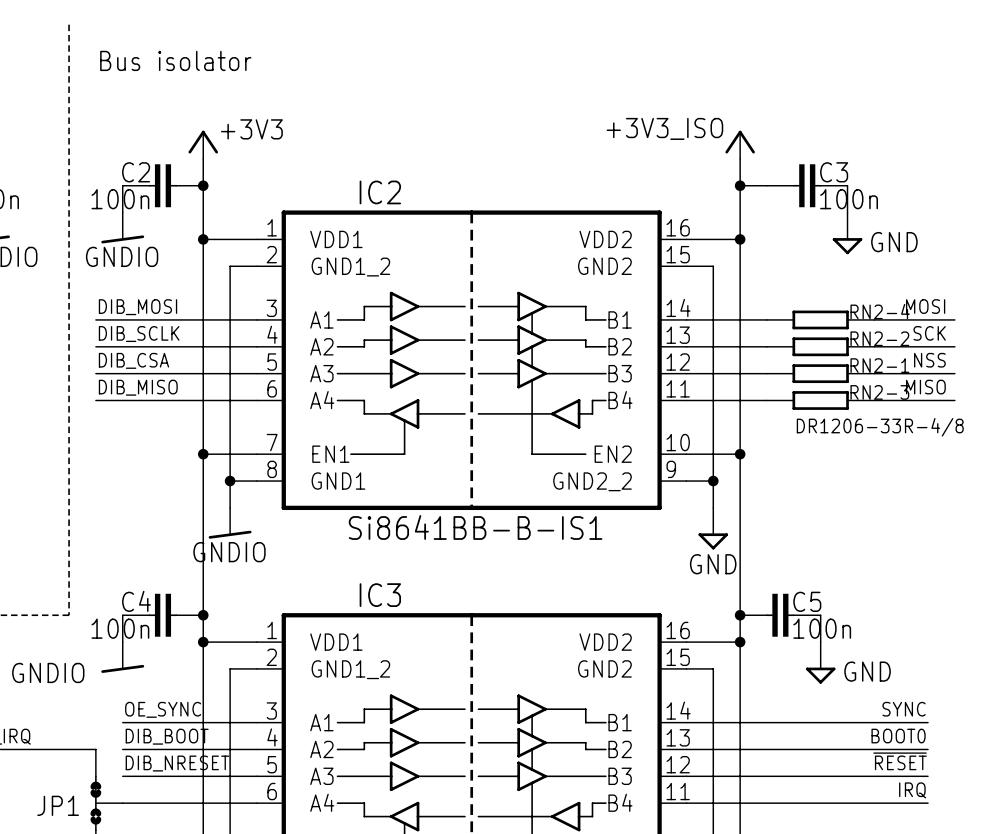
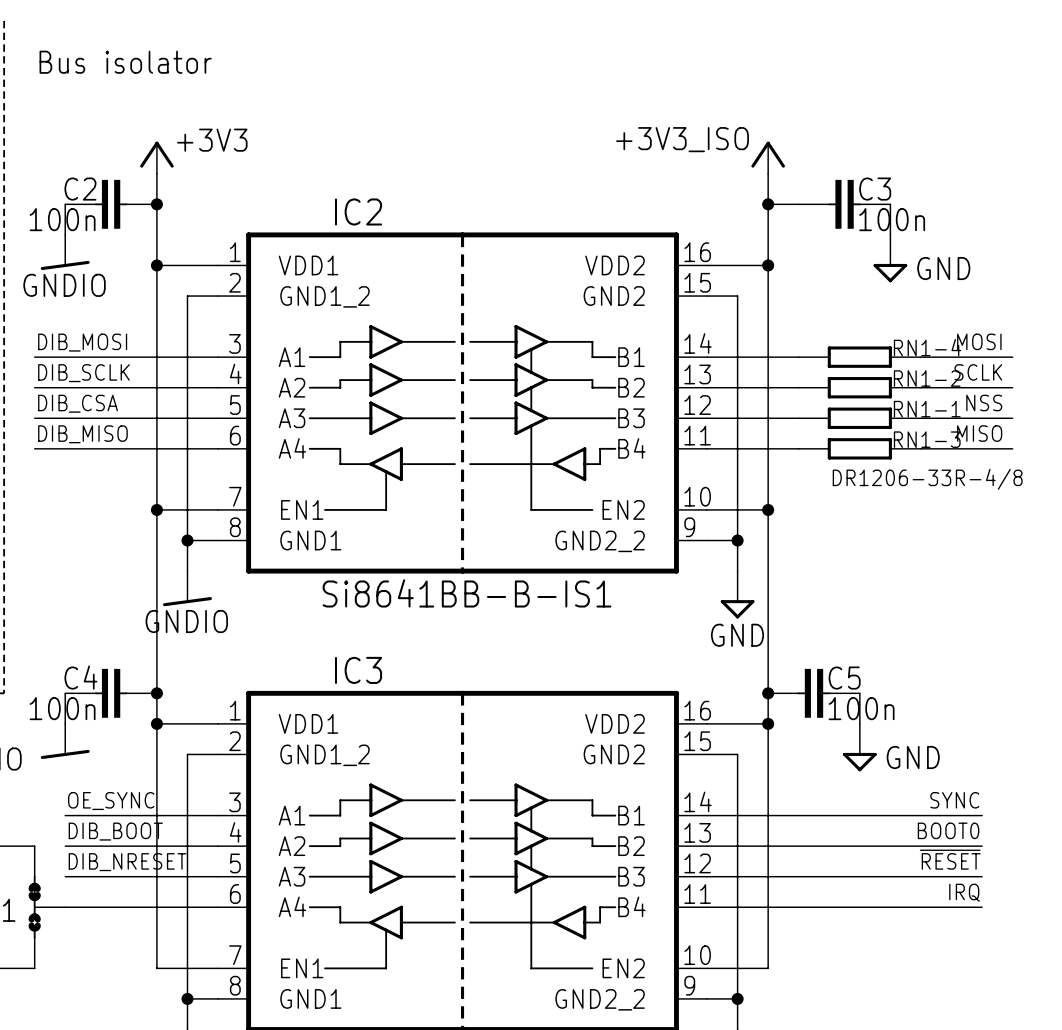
RN2-4 name: RN2-4 (880, 311) -> RN1-4 (927, 347)
label: SCK (929, 333) -> SCLK (978, 372)
RN2-2 name: RN2-2 (879, 338) -> RN1-2 (927, 378)
RN2-1 name: RN2-1 (879, 365) -> RN1-1 (927, 409)
RN2-3 name: RN2-3 (879, 392) -> RN1-3 (927, 439)

